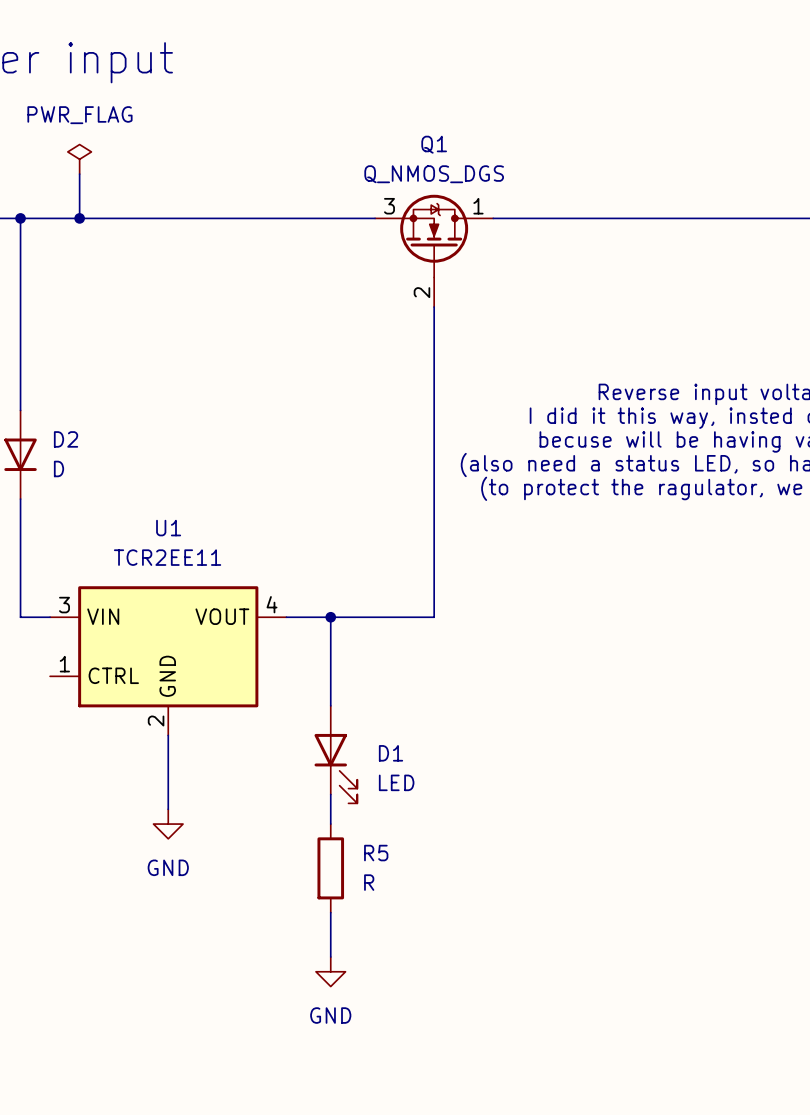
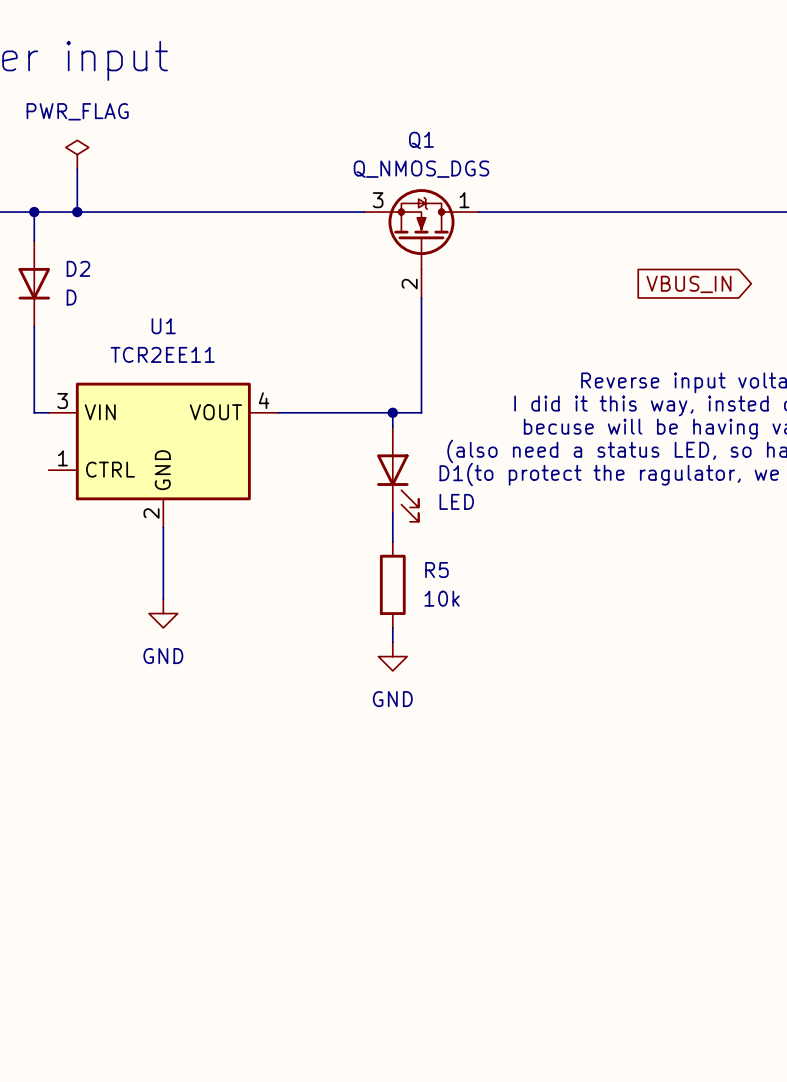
wire: (20, 218) (20, 410) -> none
junction position: (20, 218) -> (34, 212)
wire: none -> (34, 212) (34, 240)
global label: none -> VBUS_IN (688, 284)
wire: none -> (34, 326) (34, 412) (48, 412)
wire: none -> (392, 412) (392, 427)
junction: none -> (392, 412)
wire: (434, 425) (434, 617) (286, 617) -> (421, 412) (278, 412)
D2 position: (20, 454) -> (34, 283)
wire: (20, 499) (20, 617) (50, 617) -> none
wire: (330, 617) (330, 705) -> none
junction: (330, 617) -> none
power symbol: none -> GND (163, 613)
wire: none -> (392, 627) (392, 642)
U1 position: (168, 660) -> (163, 455)
power symbol: none -> GND (392, 656)
wire: (168, 735) (168, 809) -> (163, 527) (163, 599)
D1 position: (335, 754) -> (397, 474)
wire: (330, 794) (330, 824) -> (392, 513) (392, 541)
power symbol: GND (168, 824) -> none
R5 position: (330, 868) -> (392, 584)
R5 value: R (369, 882) -> 10k (442, 598)
wire: (330, 912) (330, 957) -> none
power symbol: GND (330, 971) -> none

